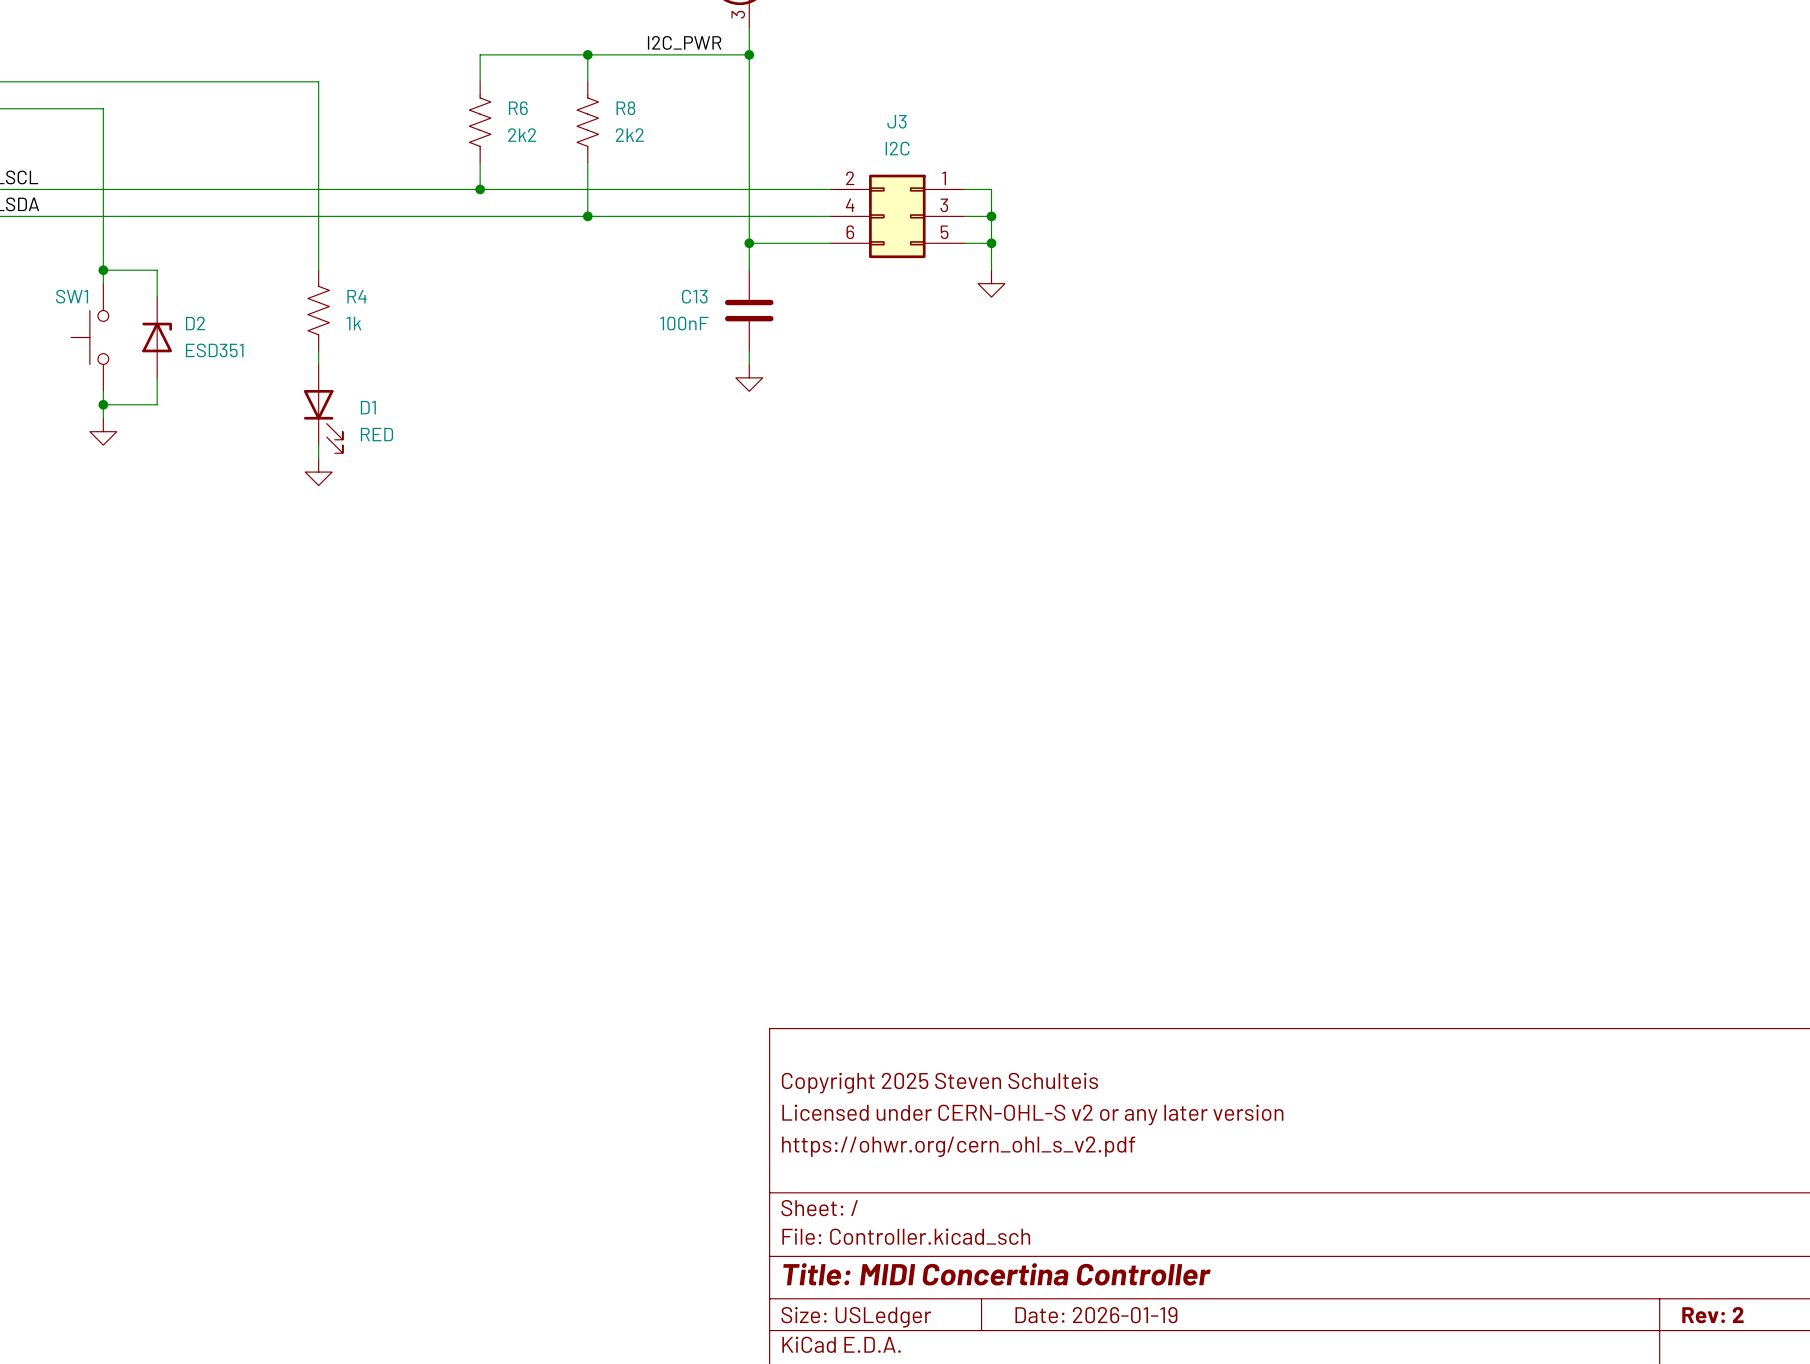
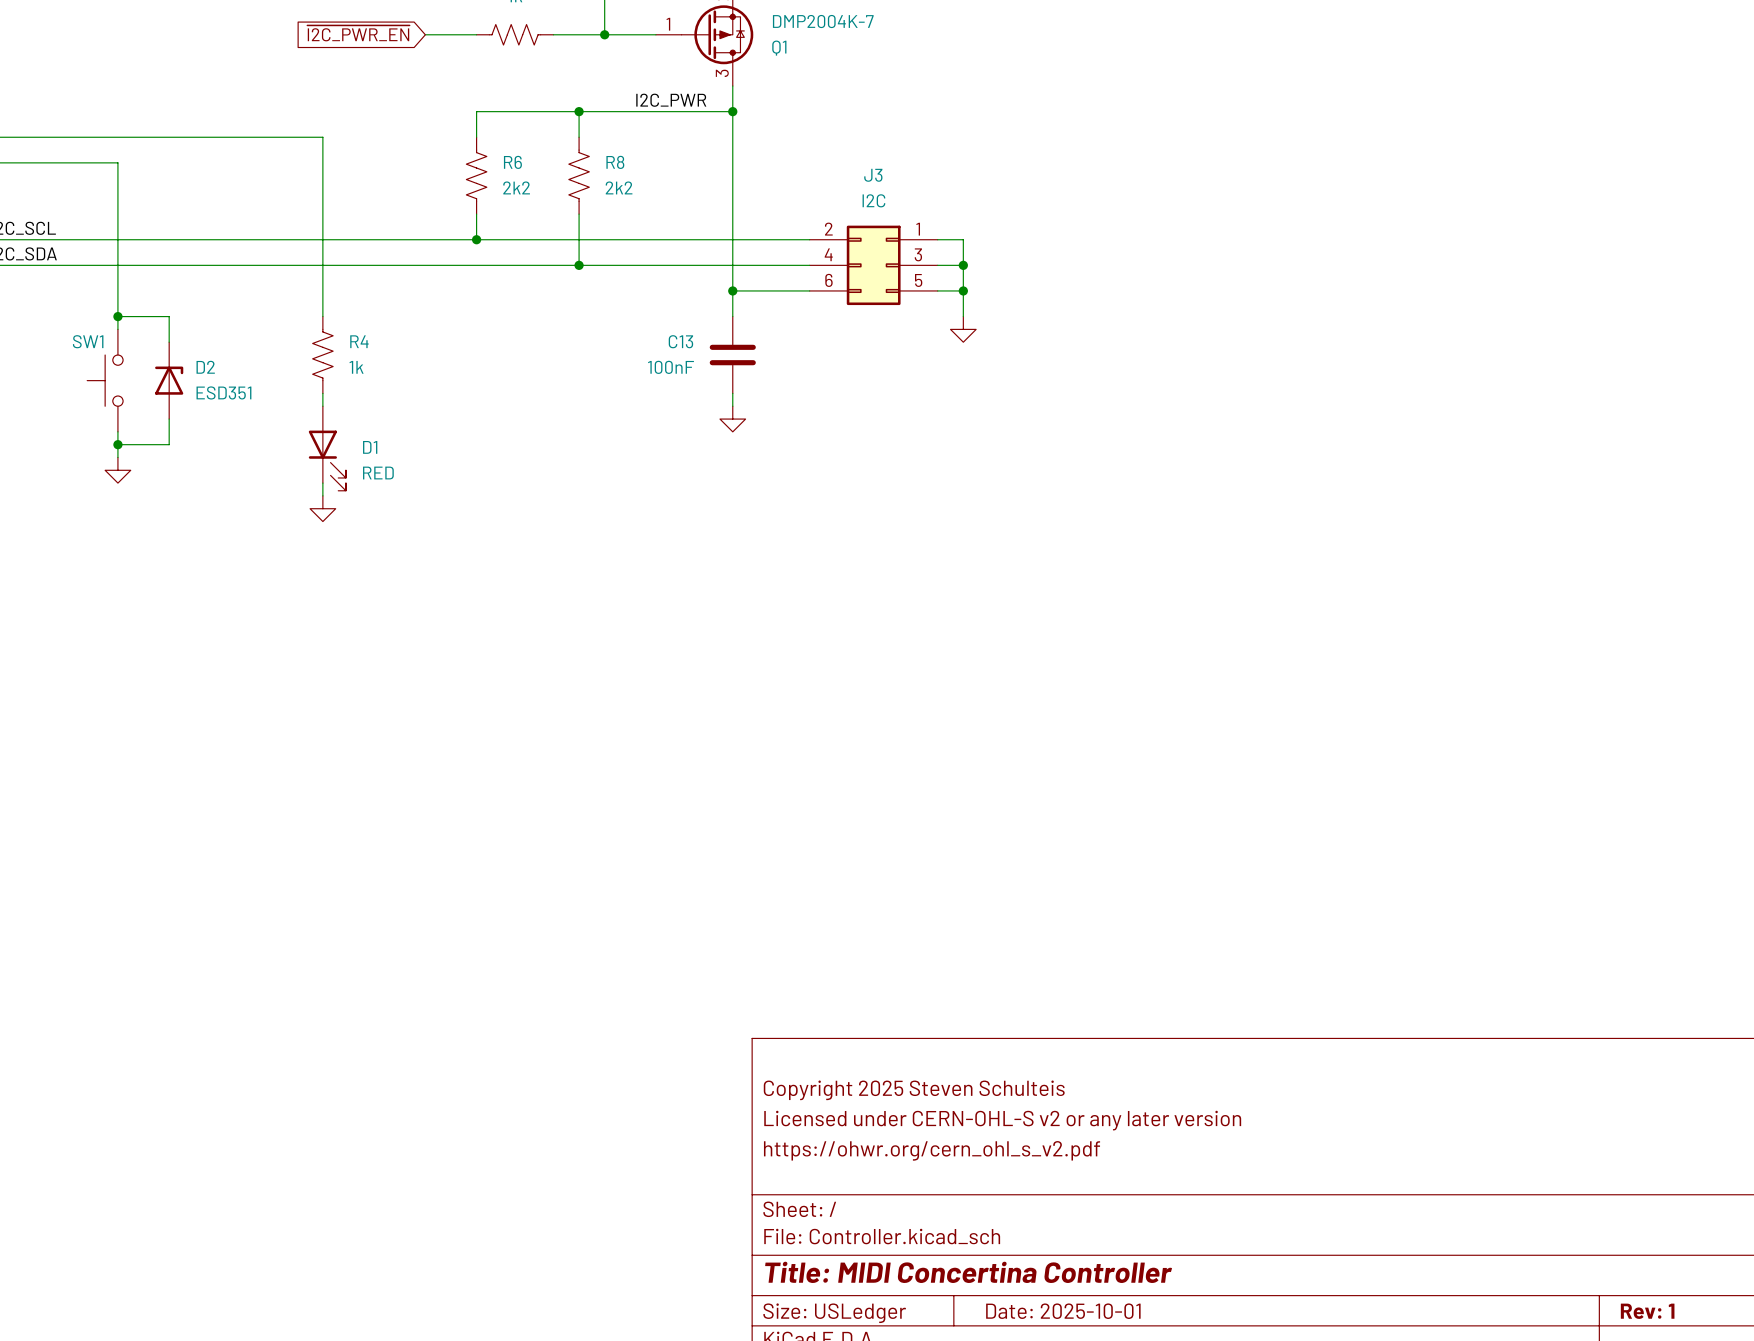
title block: Date: 2026-01-19 (1096, 1315) -> Date: 2025-10-01 (1063, 1311)
title block: Rev: 2 (1712, 1315) -> Rev: 1 (1647, 1311)

